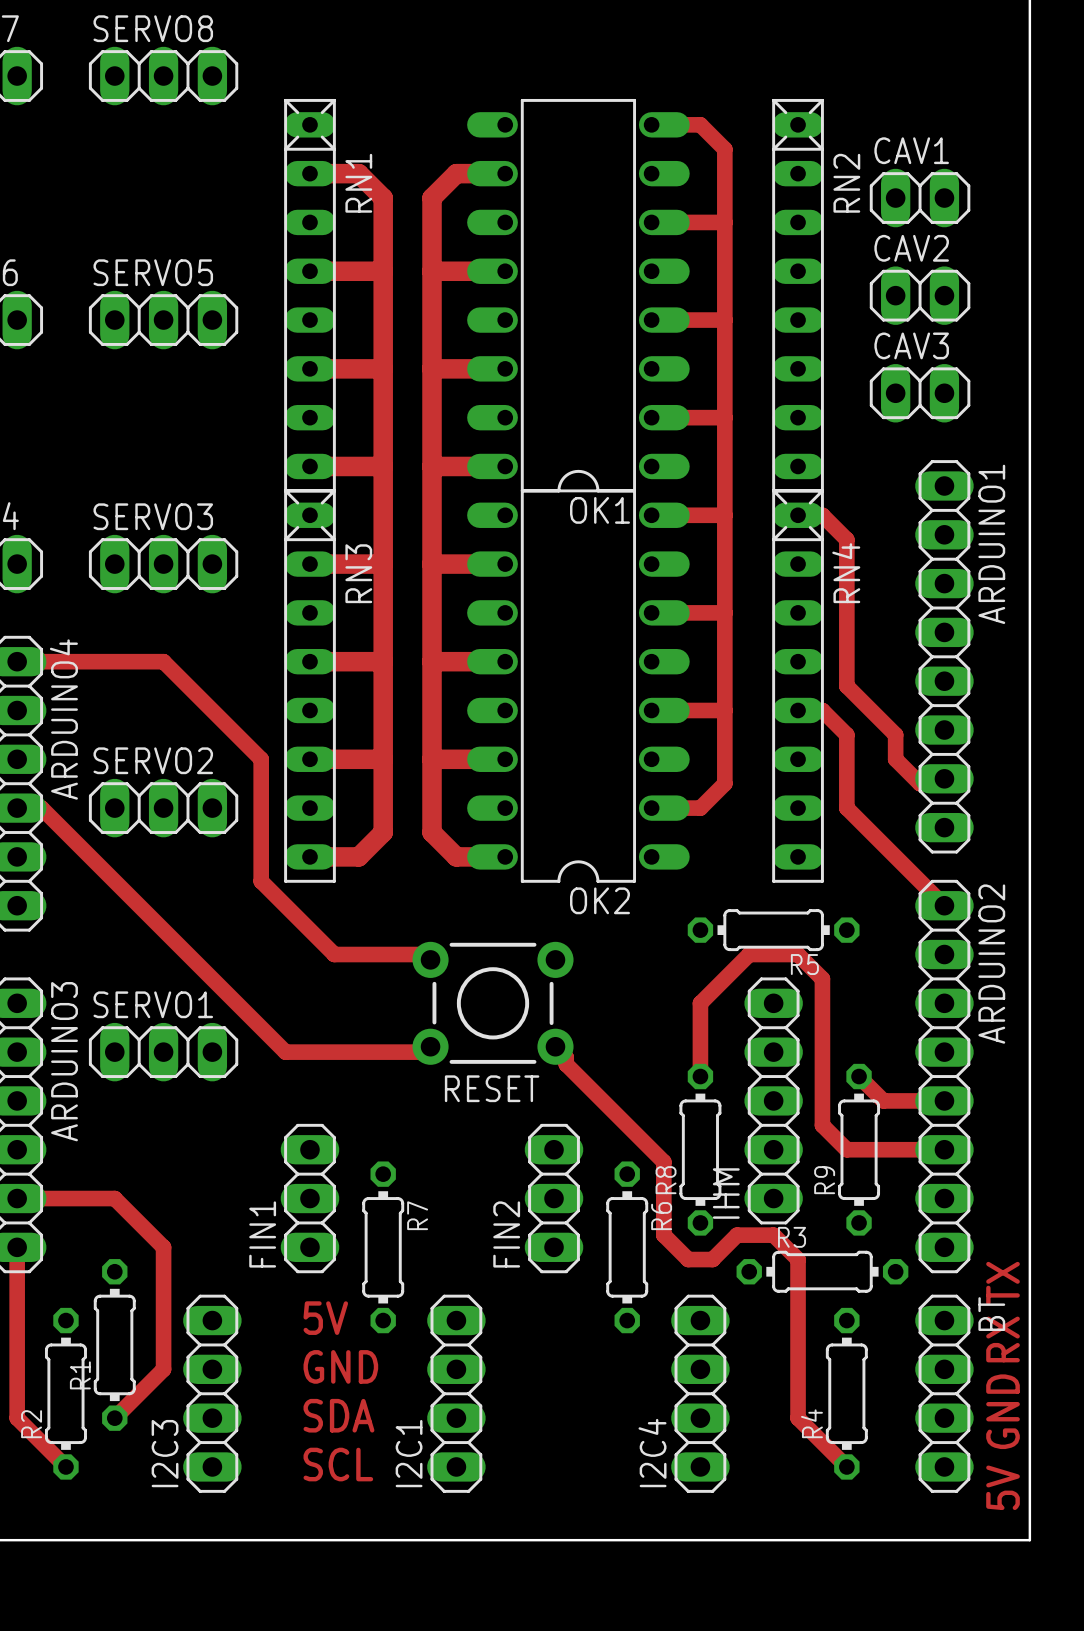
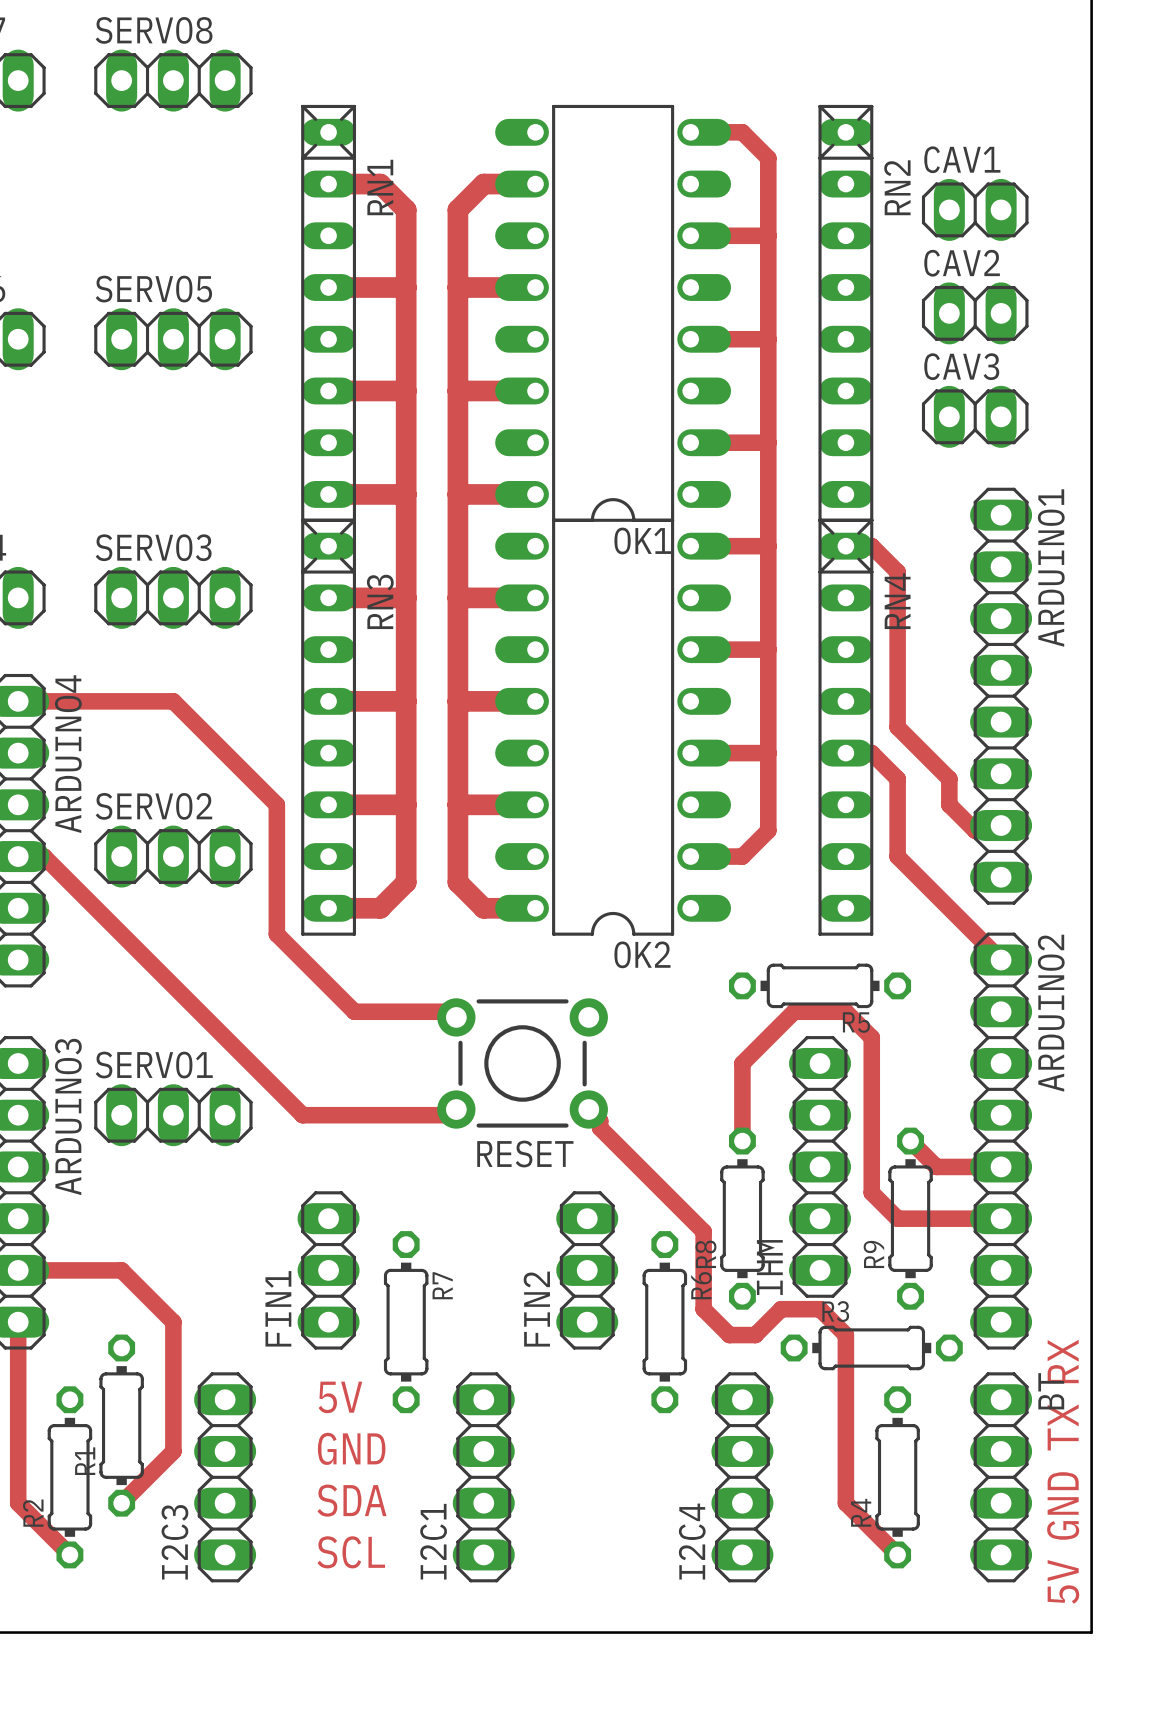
text: TX (1003, 1283) -> RX (1063, 1361)
text: RX (1003, 1339) -> TX (1063, 1427)

